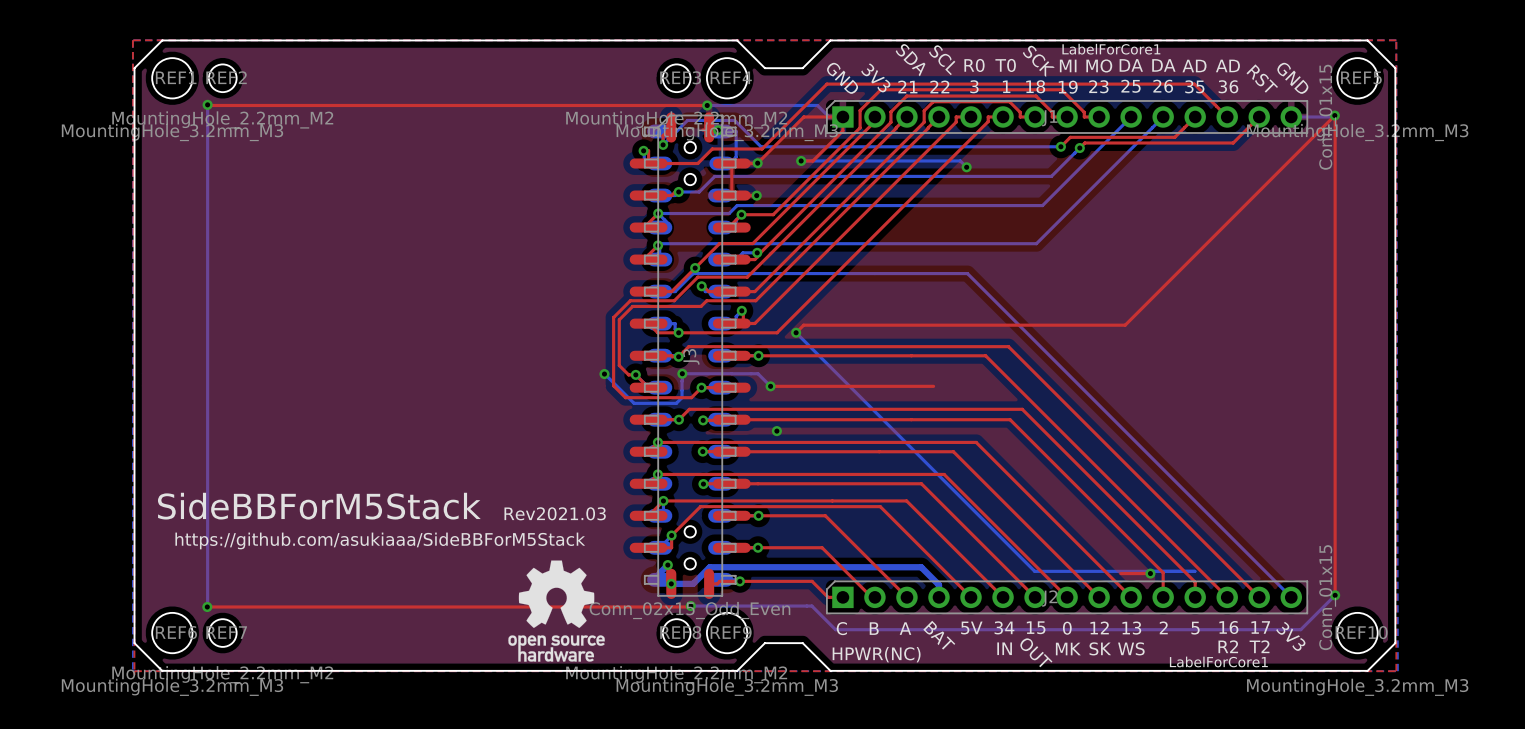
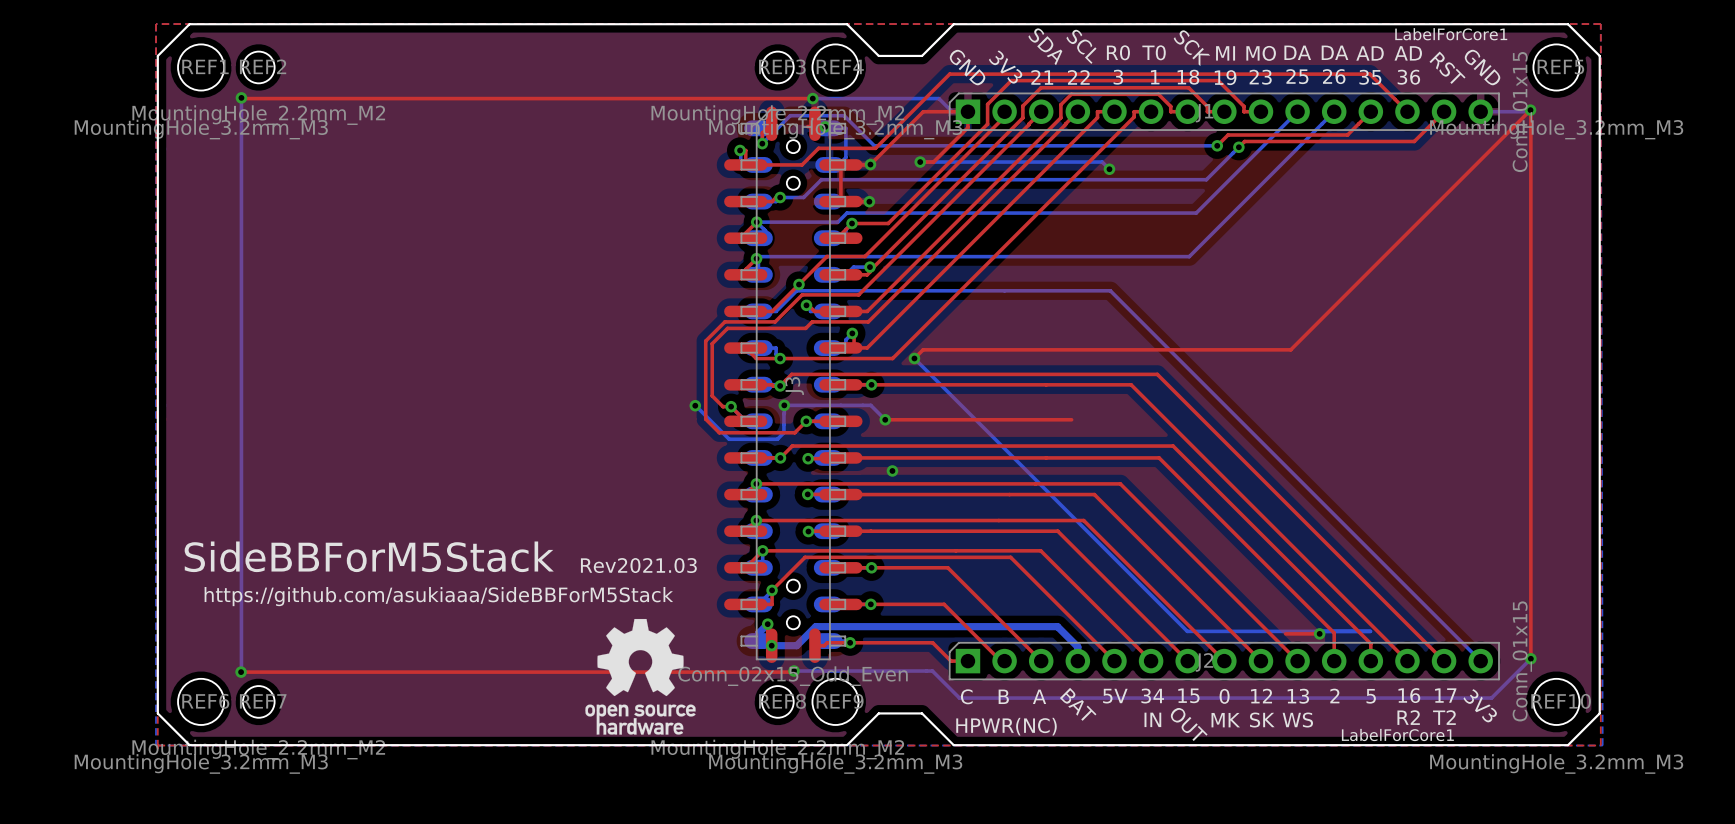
text position: LabelForCore1 (1111, 49) -> LabelForCore1 (1451, 34)

